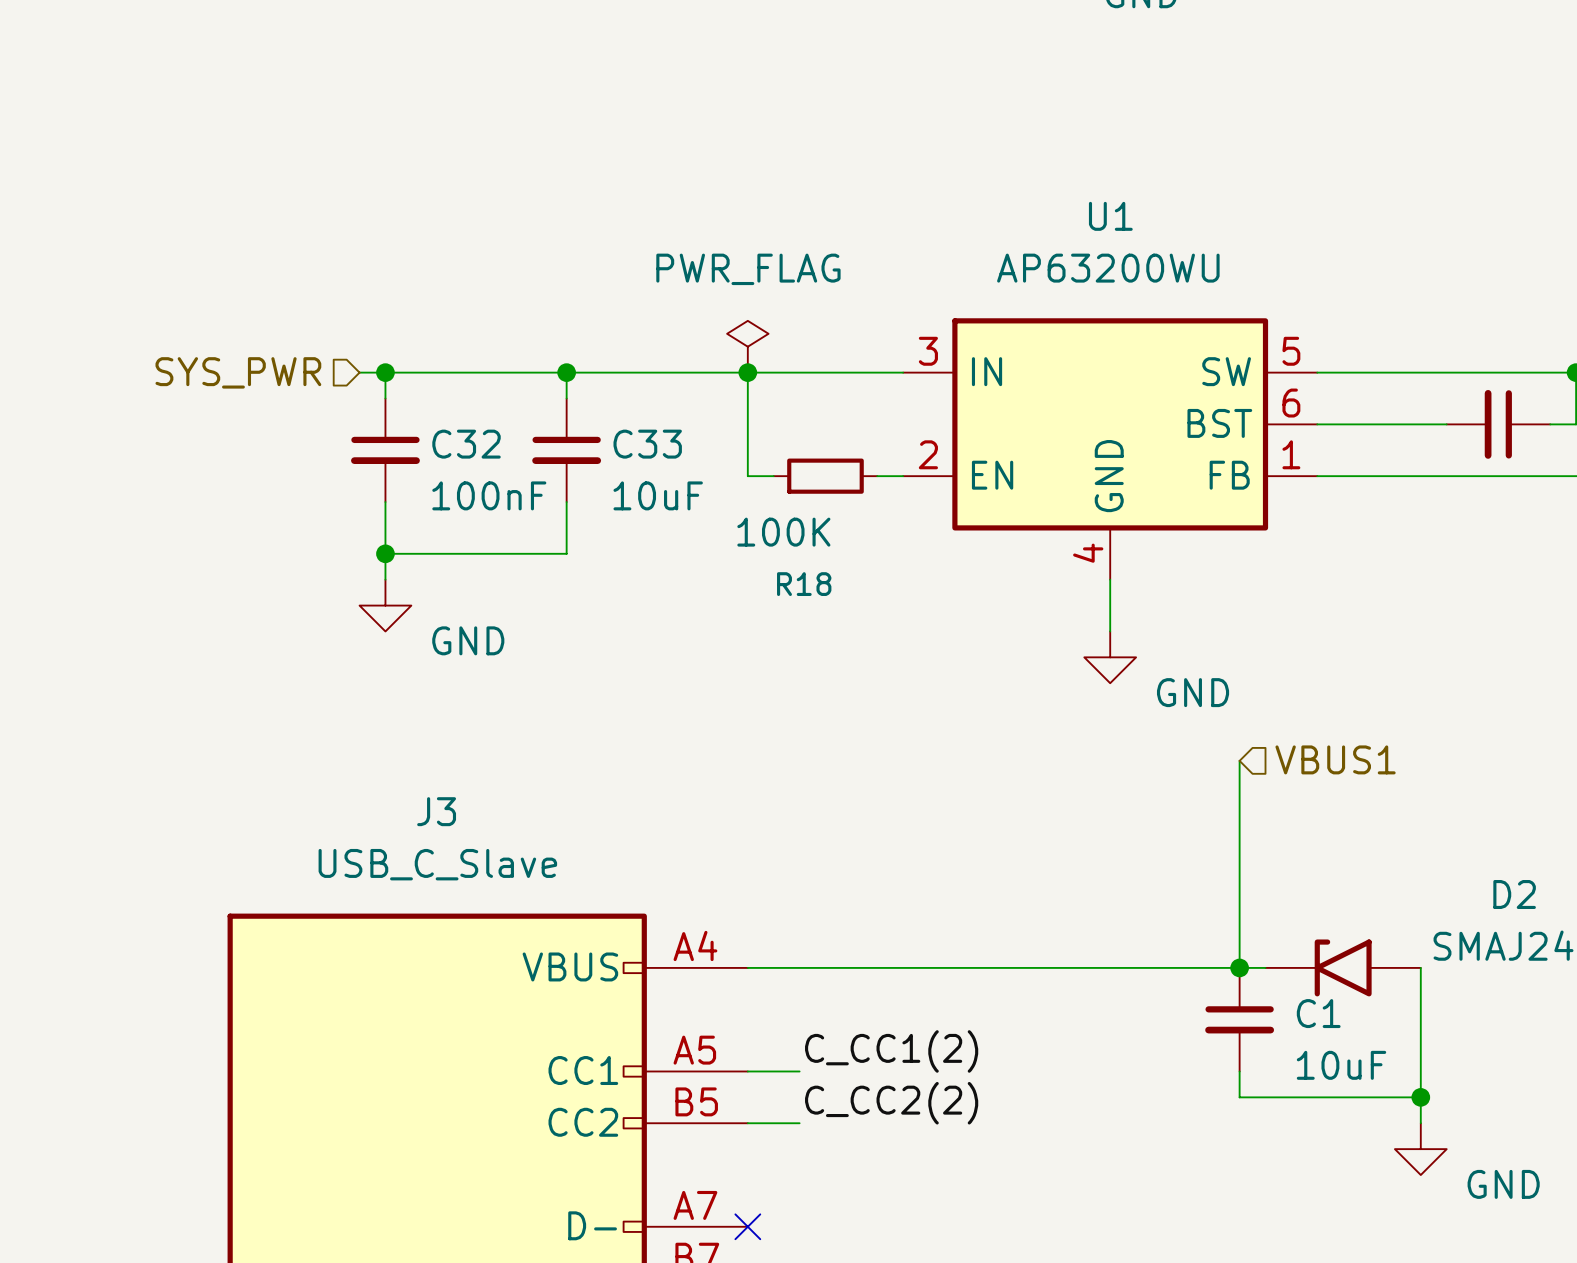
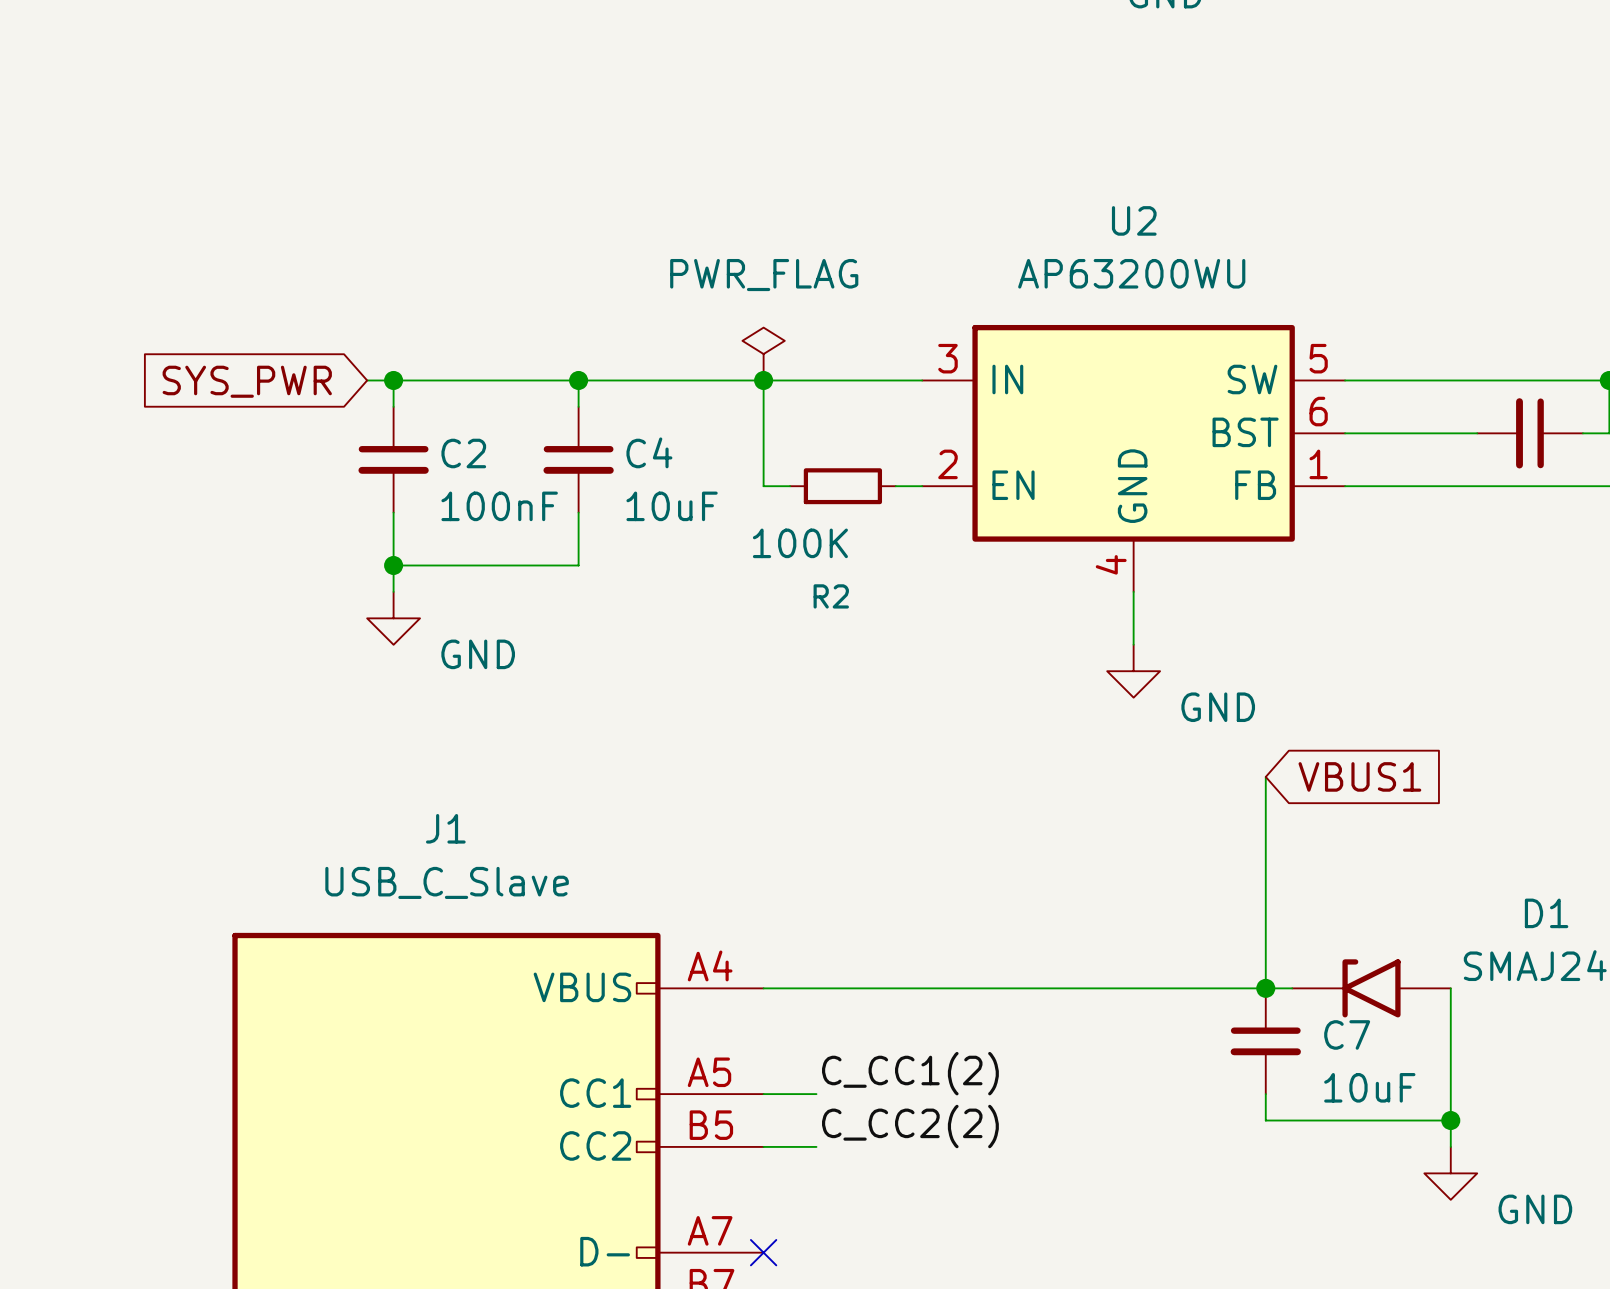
U1 name: U1 (1110, 216) -> U2 (1134, 220)
hierarchical label: SYS_PWR (238, 372) -> none
global label: none -> SYS_PWR (247, 381)
C32 name: C32 (466, 444) -> C2 (463, 453)
C33 name: C33 (647, 444) -> C4 (649, 452)
R18 name: R18 (804, 584) -> R2 (831, 596)
hierarchical label: VBUS1 (1335, 759) -> none
global label: none -> VBUS1 (1359, 776)
J3 name: J3 (436, 811) -> J1 (445, 828)
D2 name: D2 (1514, 894) -> D1 (1546, 913)
C1 name: C1 (1318, 1013) -> C7 (1347, 1034)

